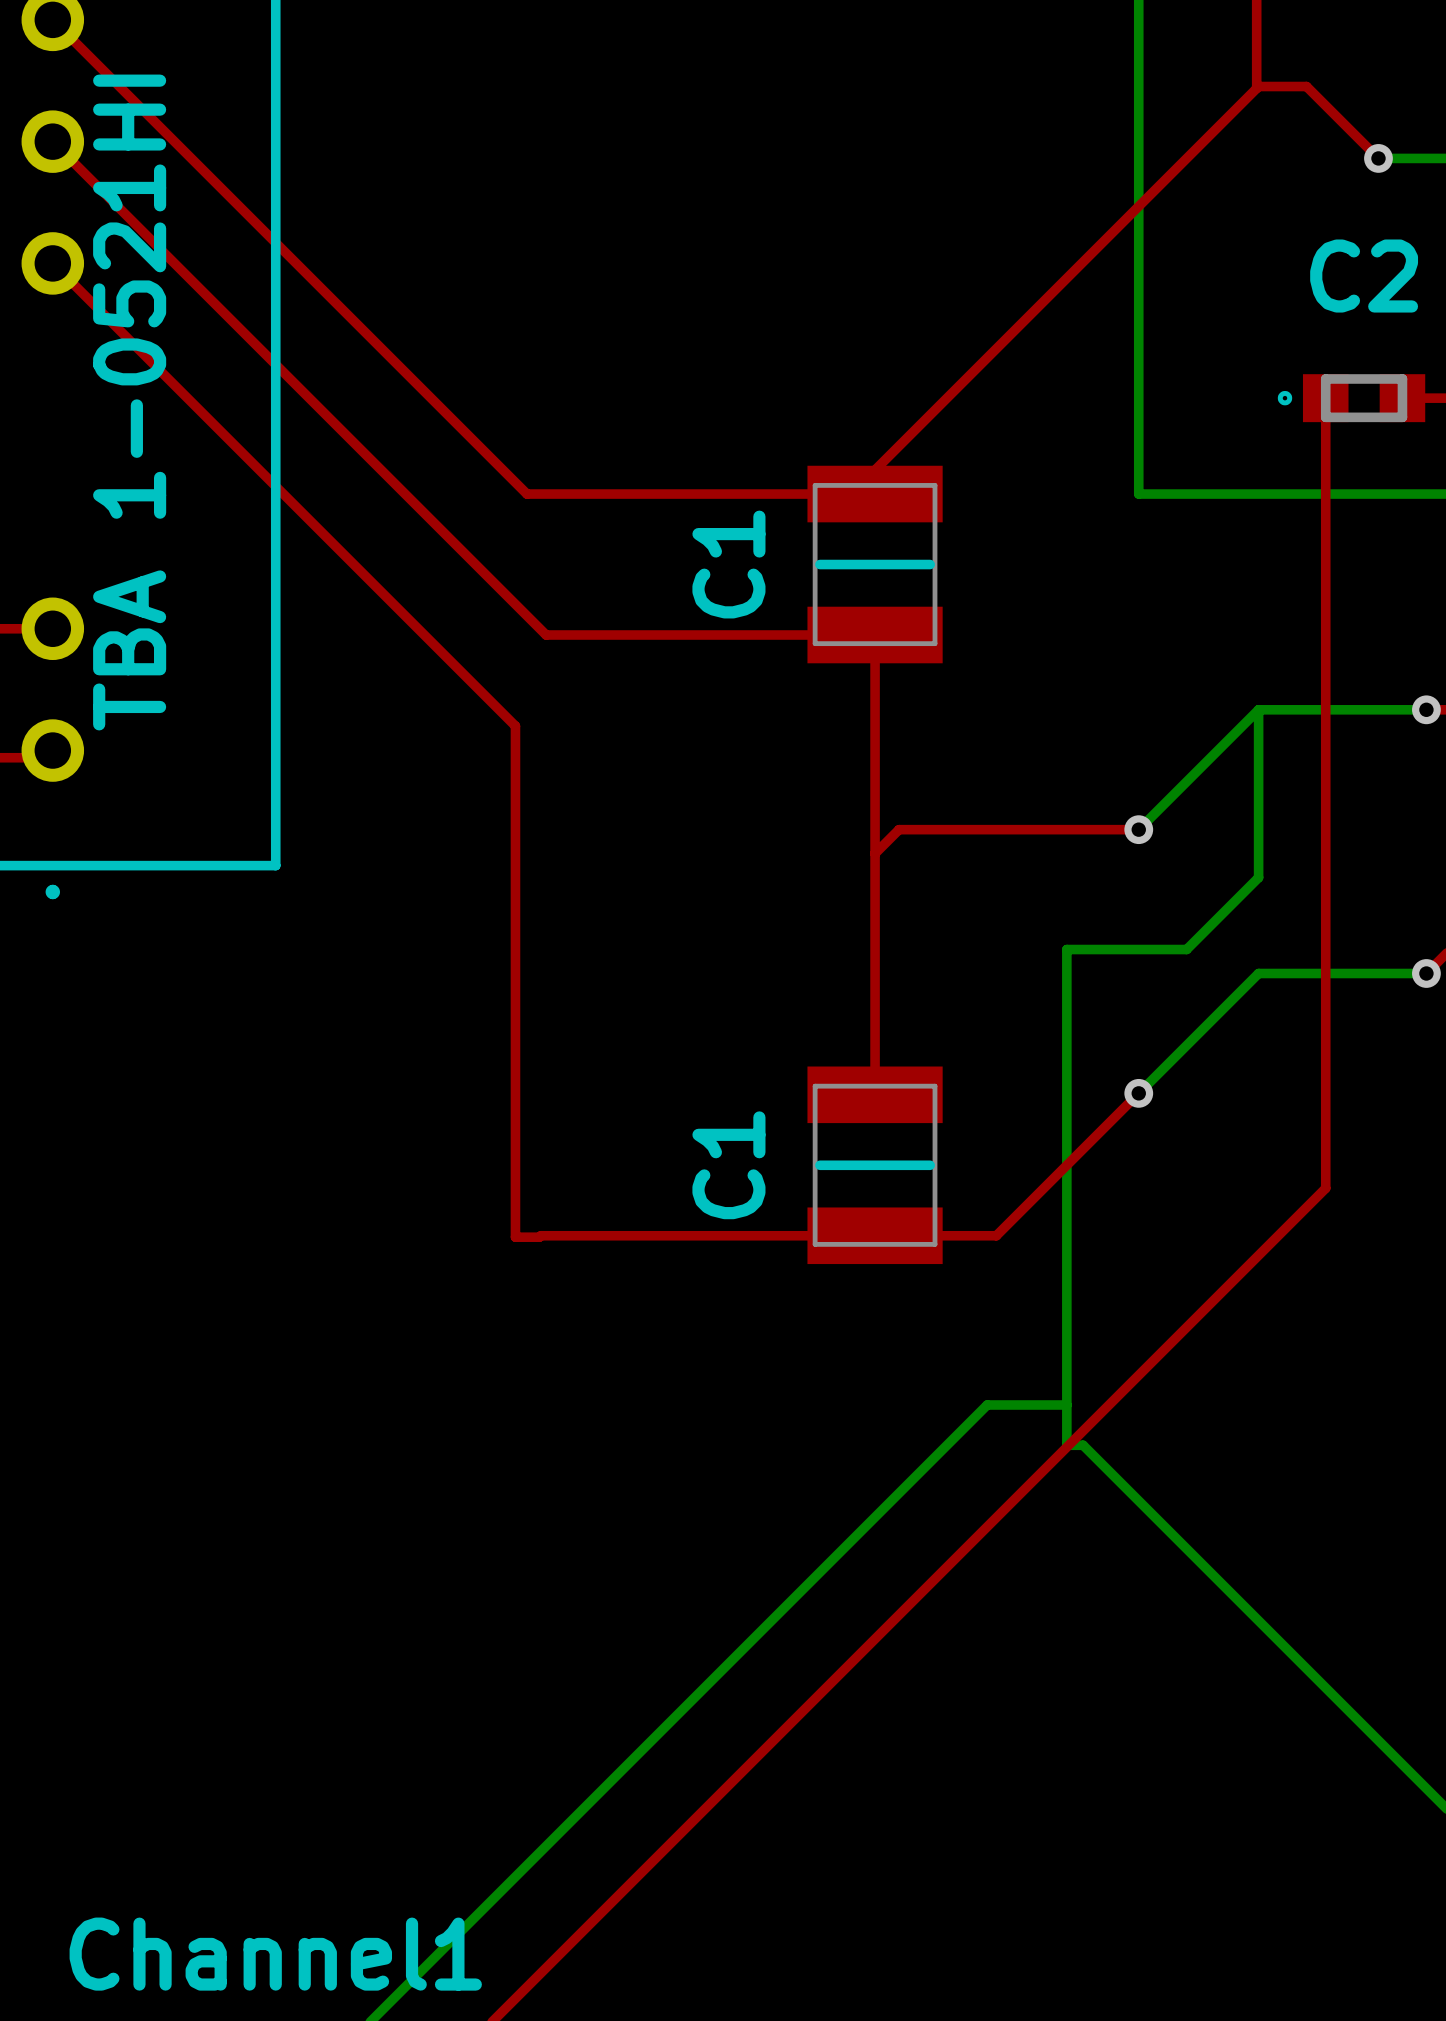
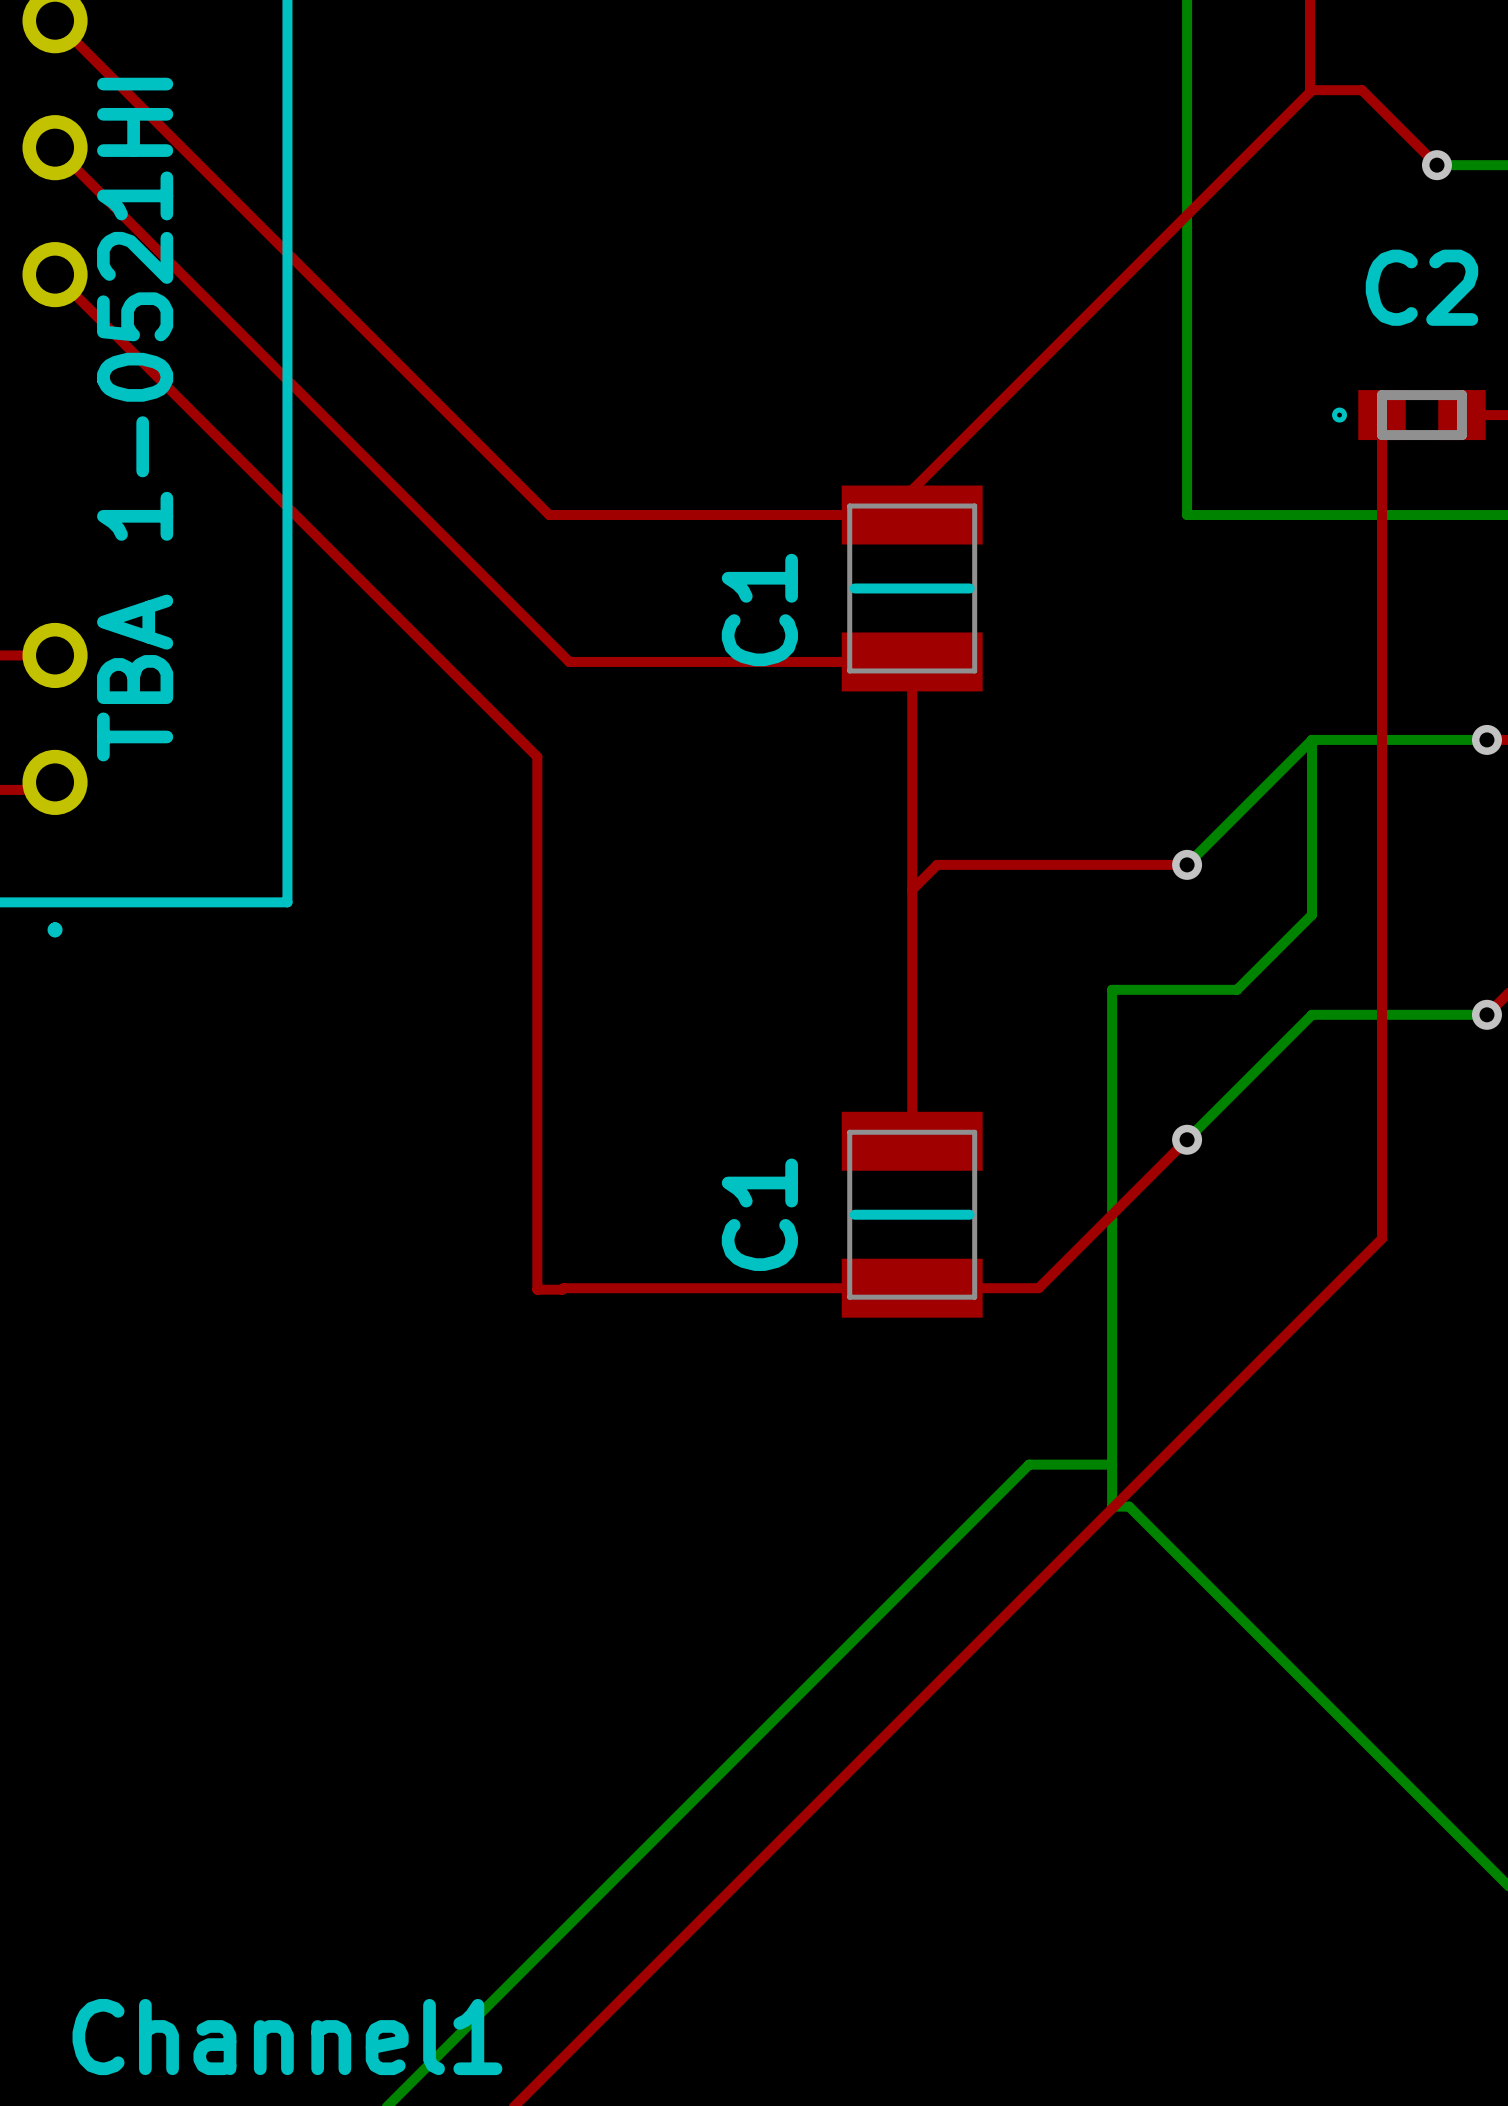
C1 name position: C1 (728, 564) -> C1 (759, 609)

